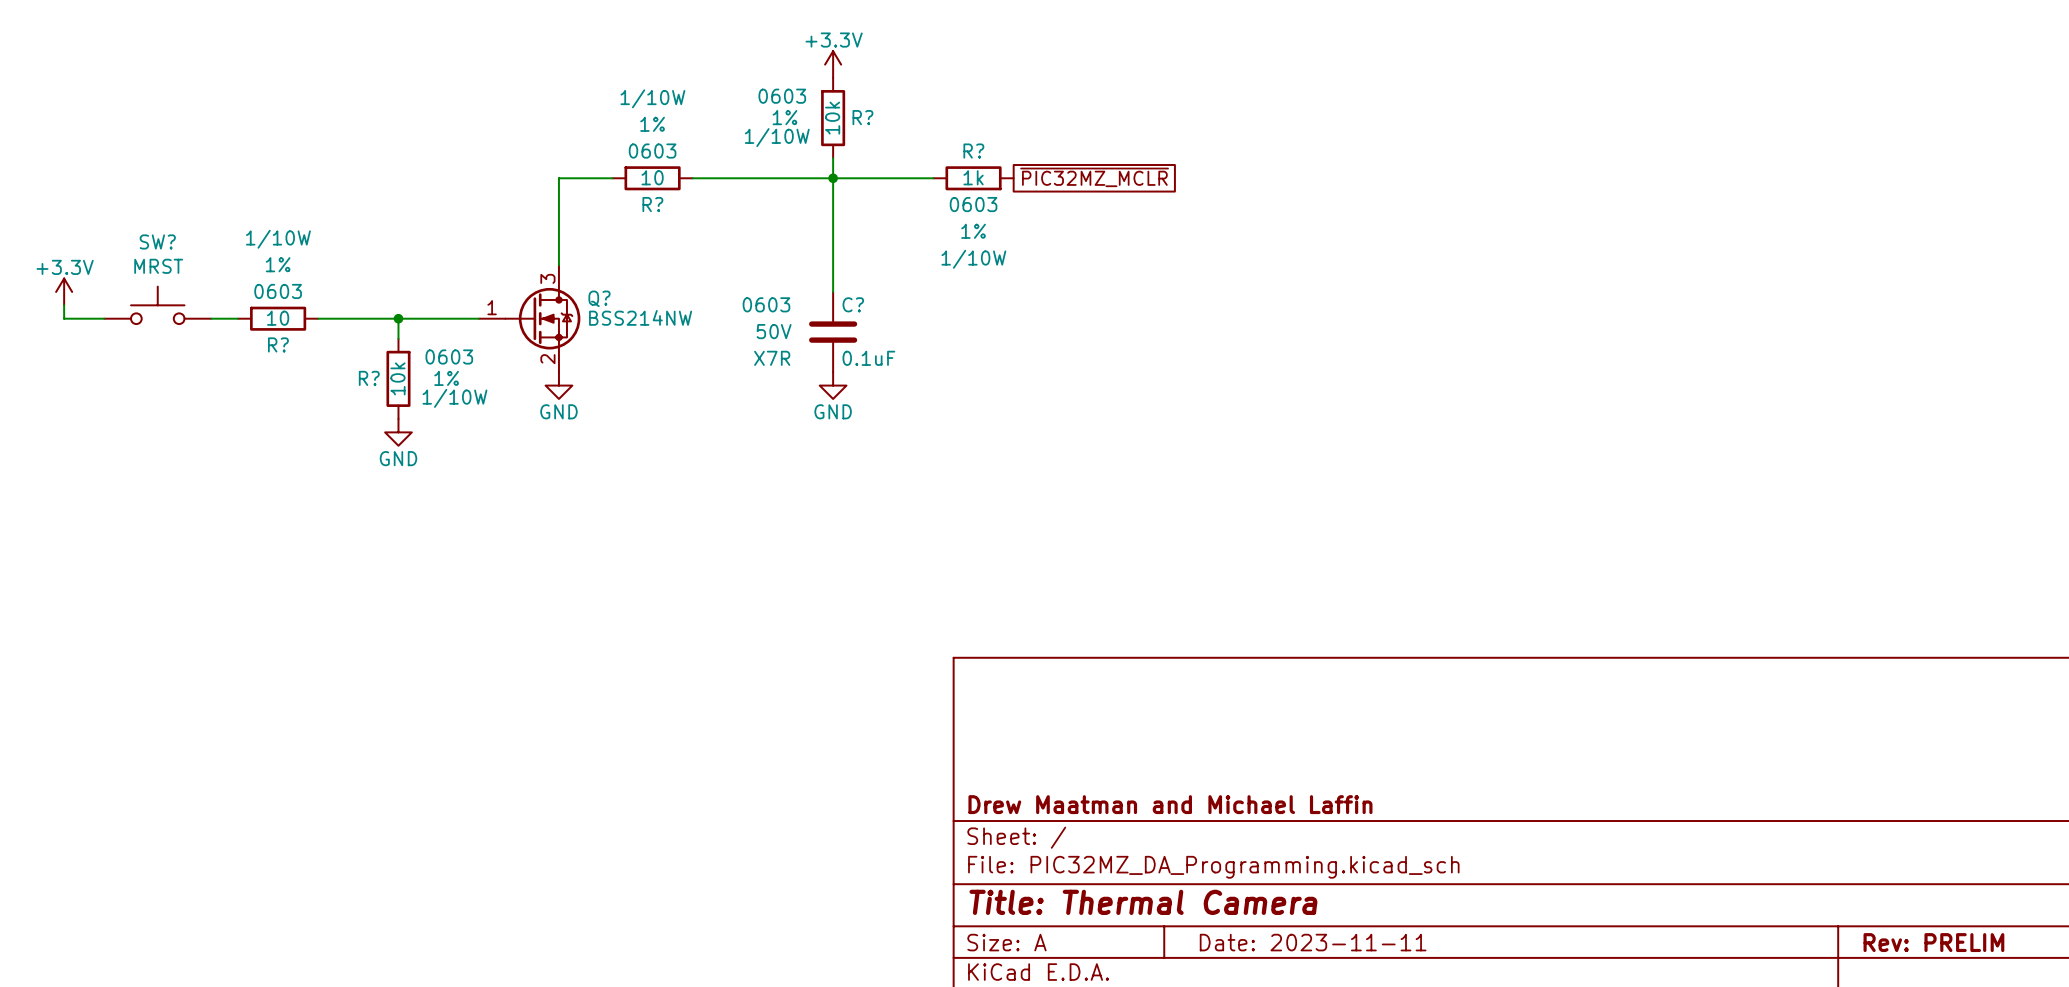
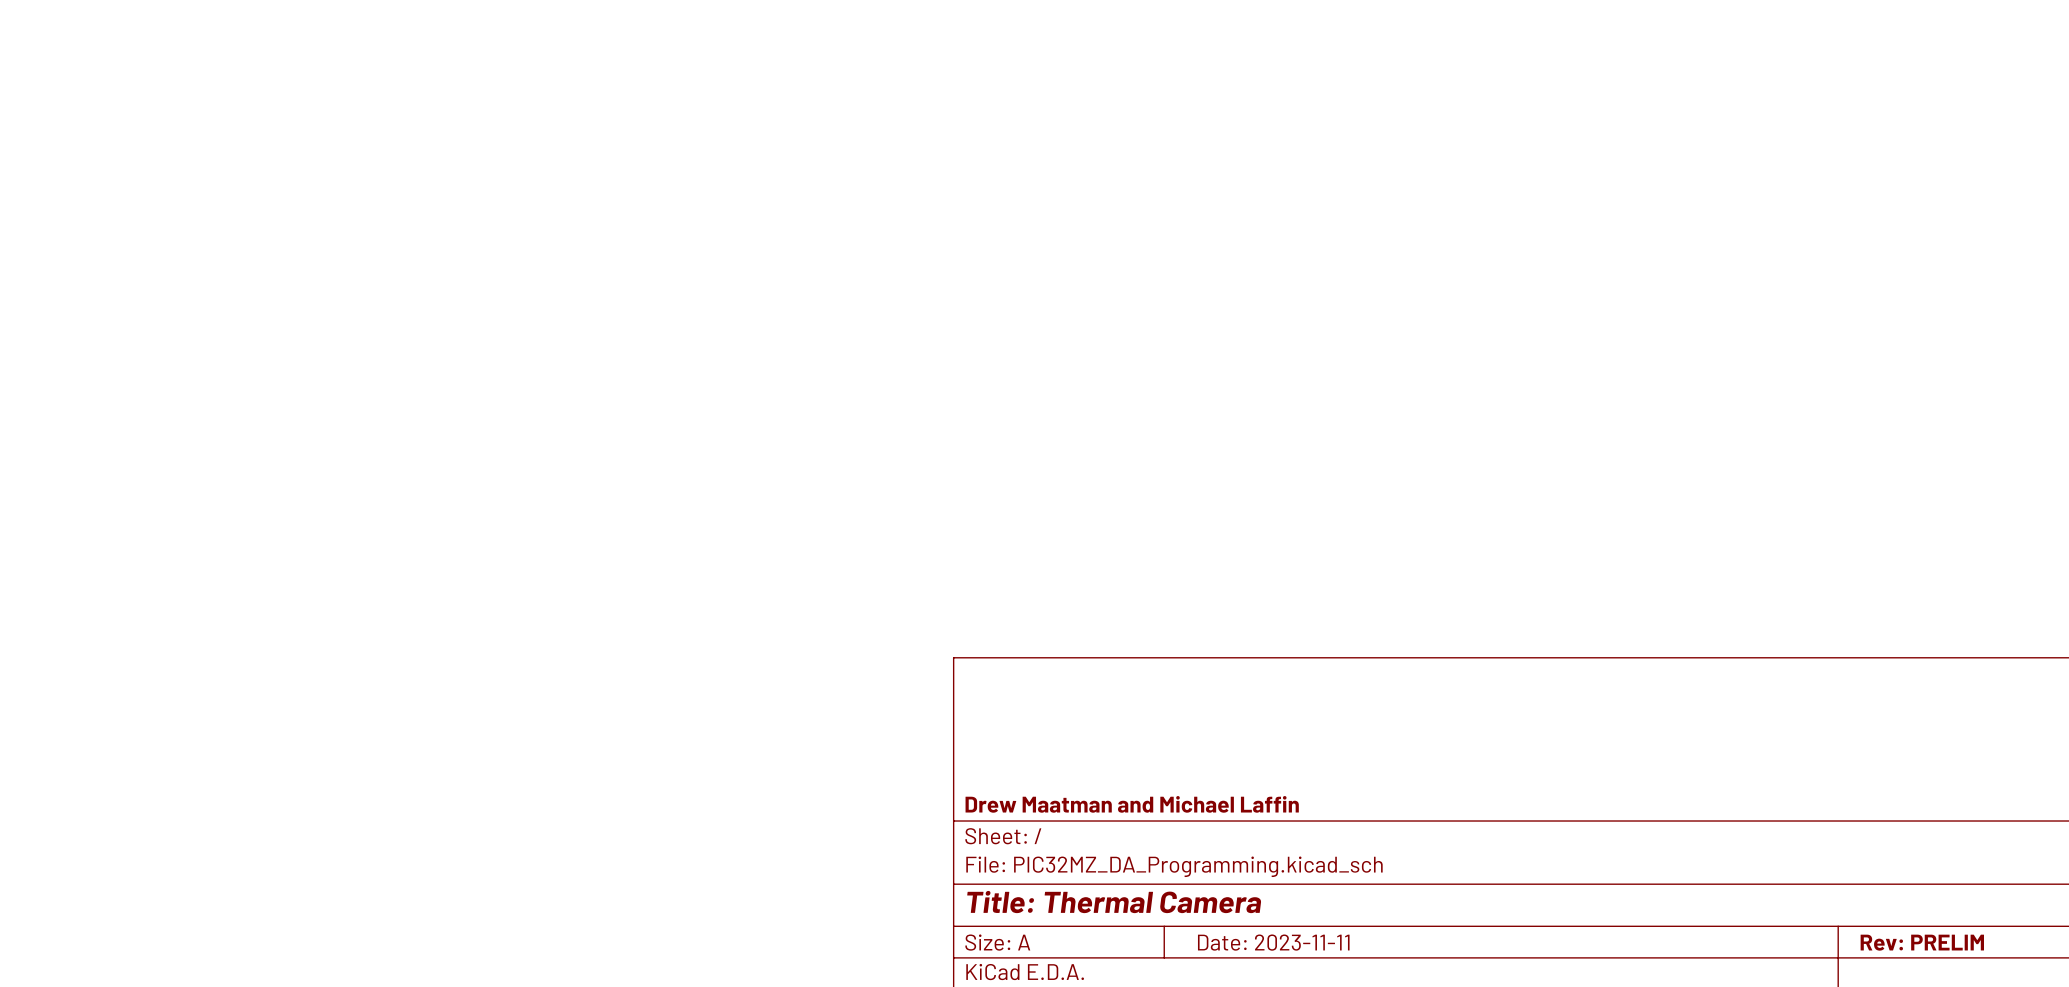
power symbol: +3.3V (833, 64) -> none
R?: 10k (833, 118) -> none
wire: (833, 158) (833, 291) -> none
global label: ~{PIC32MZ_MCLR} (1094, 177) -> none
wire: (612, 178) (558, 178) (558, 265) -> none
R?: 10 (652, 178) -> none
wire: (692, 178) (933, 178) -> none
junction: (833, 178) -> none
R?: 1k (973, 178) -> none
power symbol: +3.3V (64, 291) -> none
wire: (64, 305) (64, 318) (104, 318) -> none
SW?: MRST (157, 305) -> none
wire: (211, 318) (237, 318) -> none
R?: 10 (278, 318) -> none
wire: (318, 318) (478, 318) -> none
wire: (398, 318) (398, 338) -> none
junction: (398, 318) -> none
Q?: BSS214NW (529, 318) -> none
C?: 0.1uF (833, 332) -> none
R?: 10k (398, 378) -> none
power symbol: GND (558, 385) -> none
power symbol: GND (833, 385) -> none
power symbol: GND (398, 432) -> none

